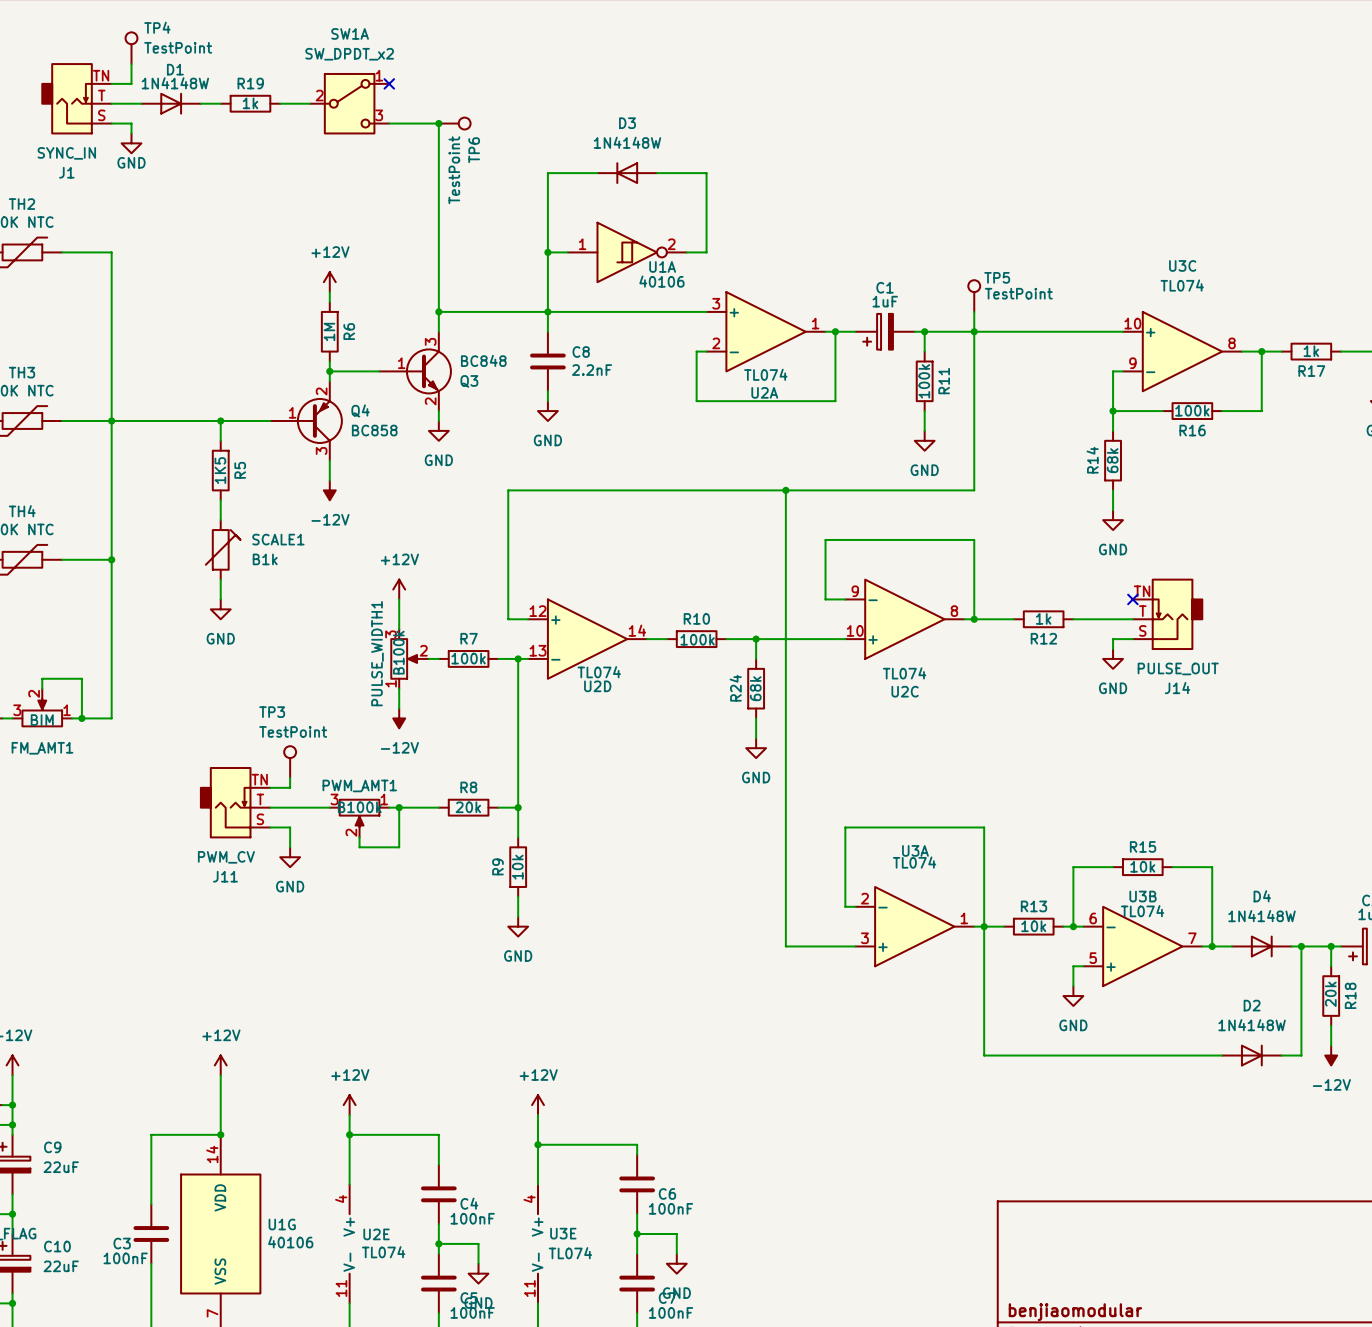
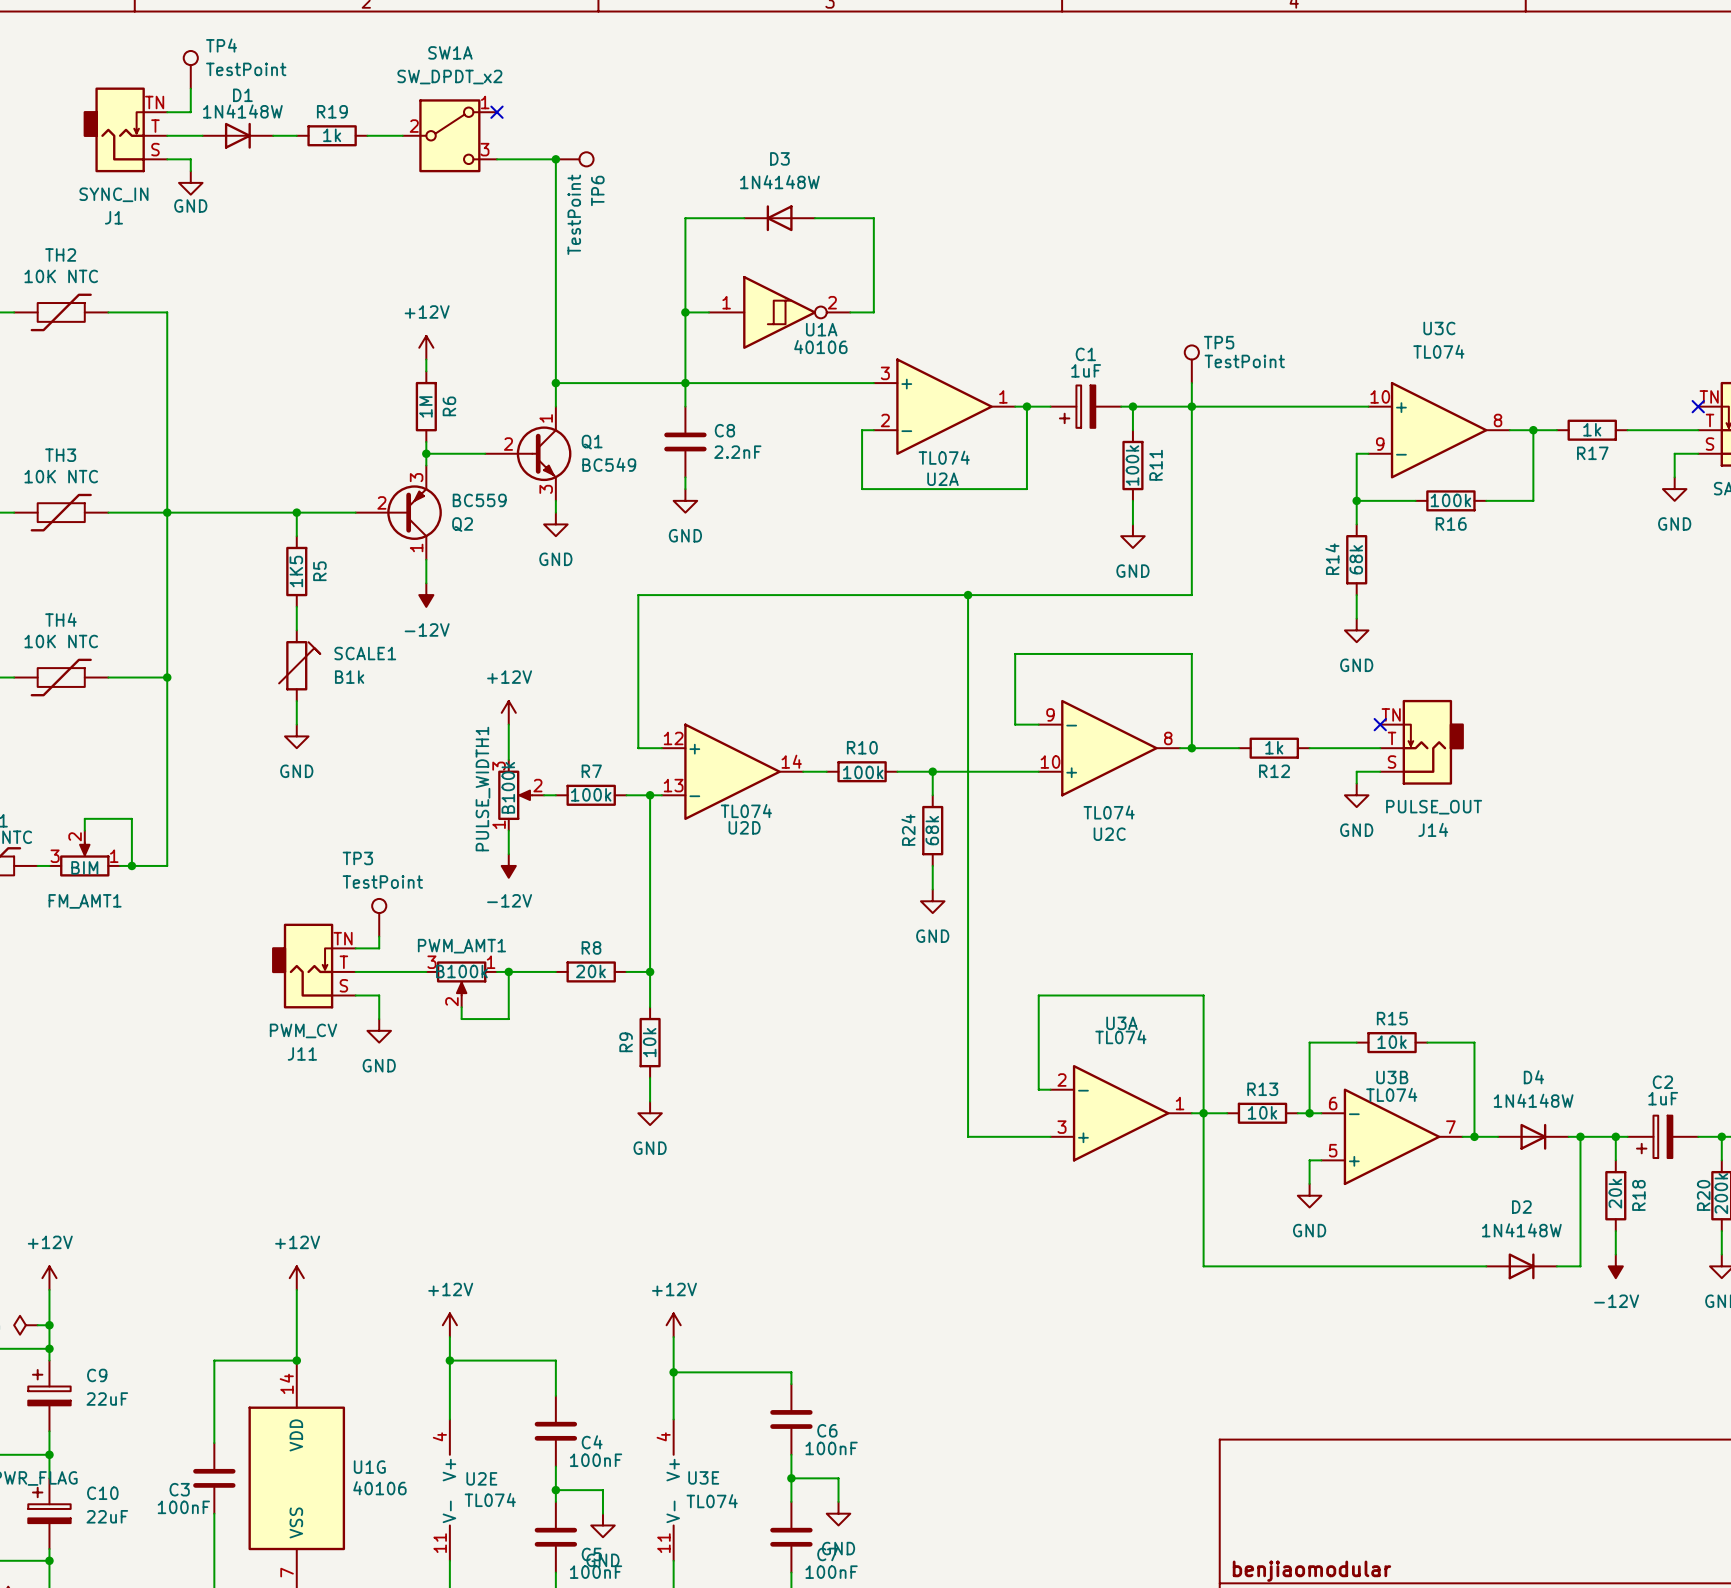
Q3: BC848 (415, 371) -> none
Q1: none -> BC549 (528, 453)
Q4 pin number: 2 (321, 391) -> 3 (416, 477)
Q4 name: Q4 (360, 410) -> Q2 (462, 524)
Q4 pin number: 1 (292, 412) -> 2 (381, 502)
Q4 value: BC858 (374, 430) -> BC559 (479, 500)
Q4 pin number: 3 (321, 450) -> 1 (416, 547)

